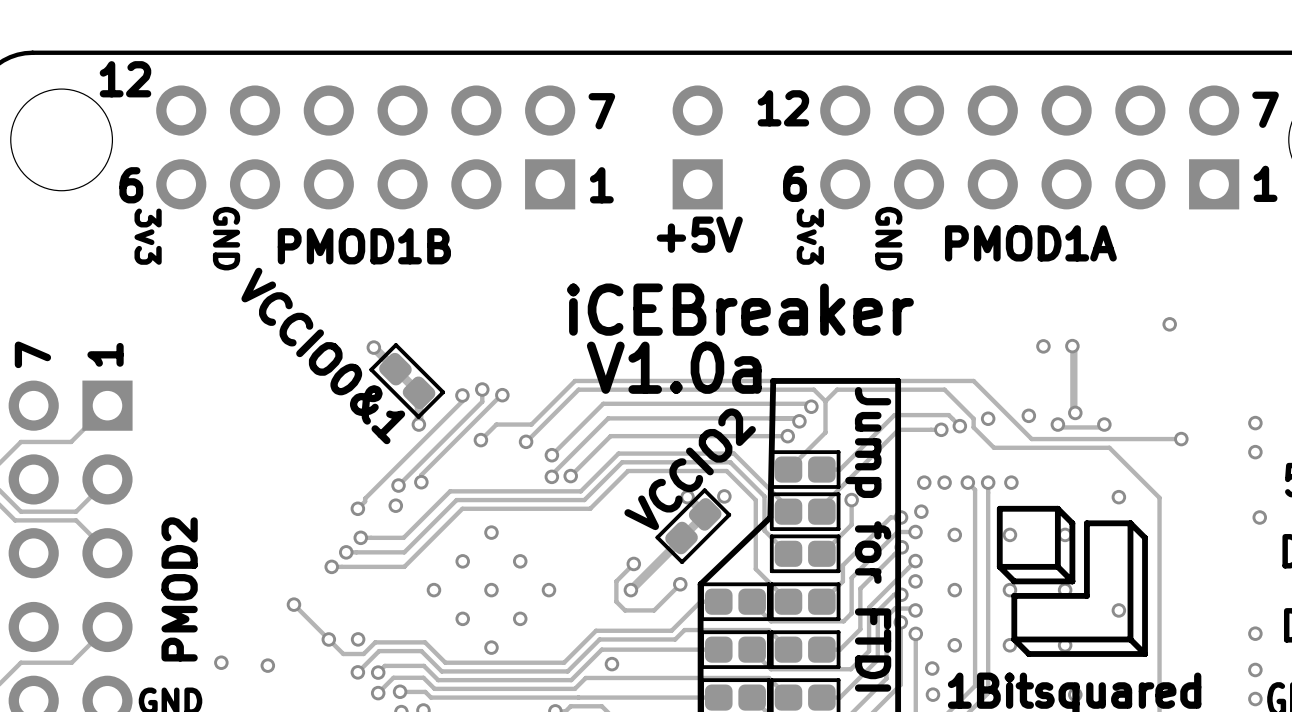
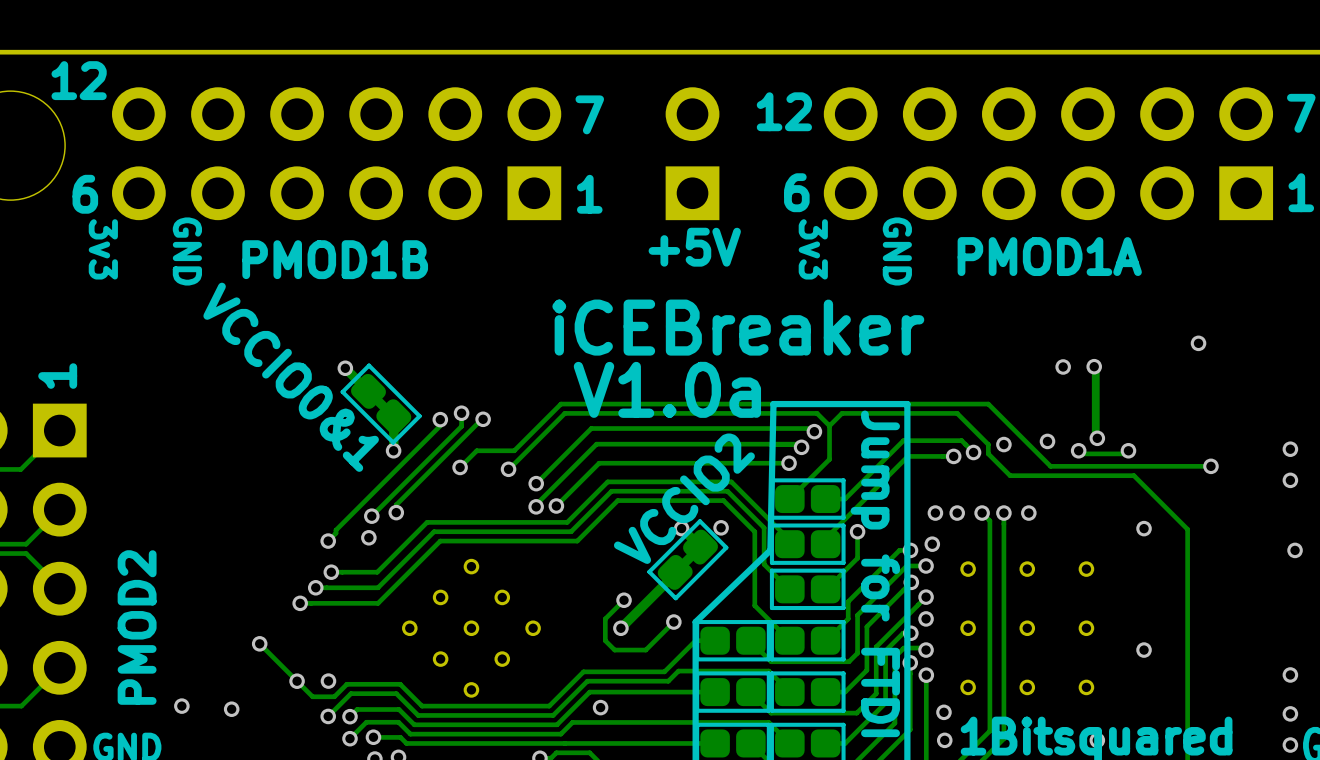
drawing: [996, 505, 1148, 657] -> none

